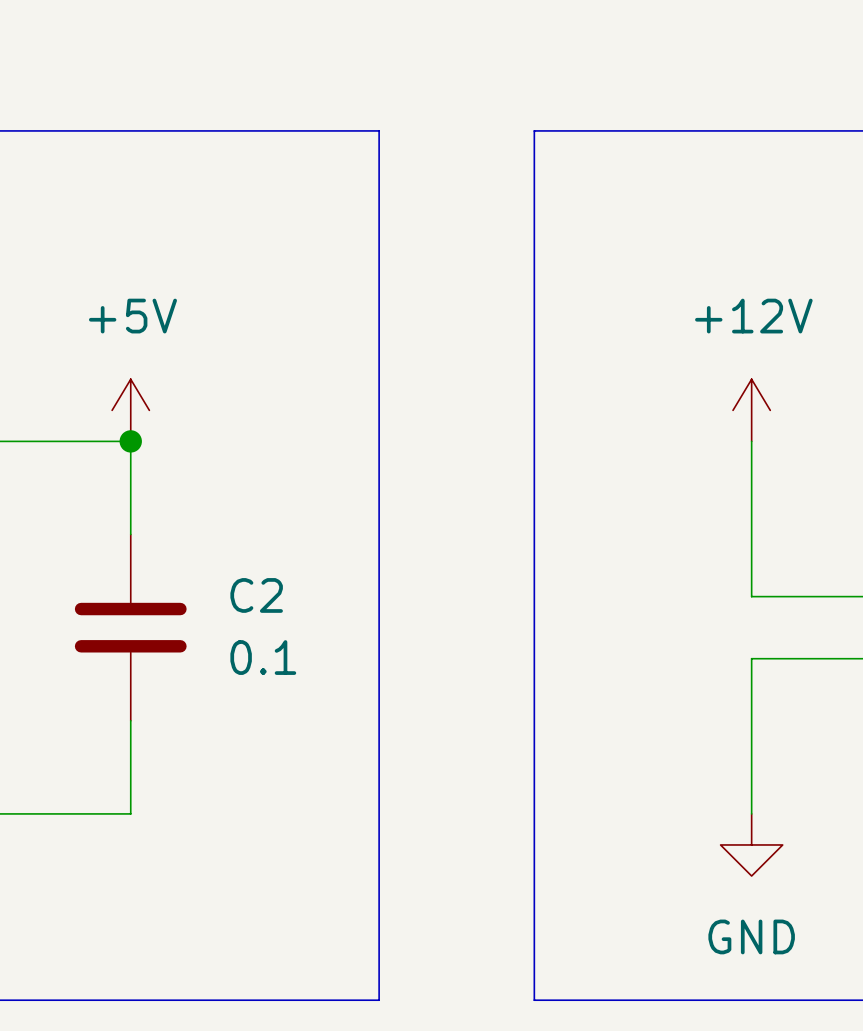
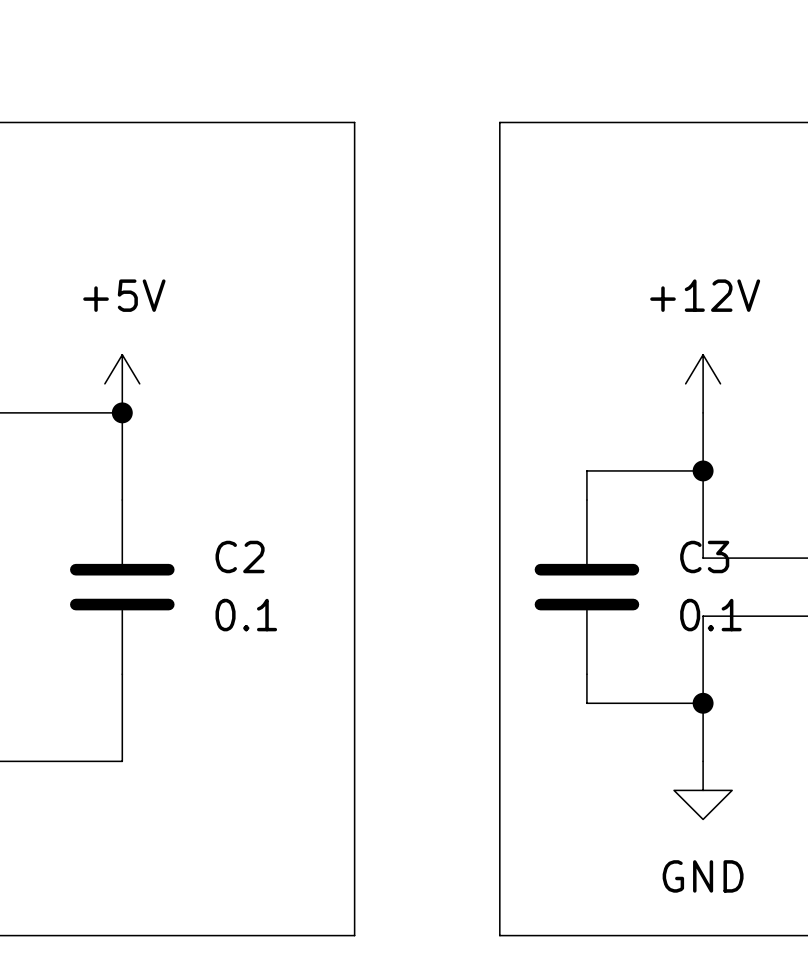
wire: none -> (703, 470) (586, 470) (586, 500)
junction: none -> (703, 470)
C3: none -> 0.1 (586, 587)
wire: none -> (586, 674) (586, 703) (703, 703)
junction: none -> (703, 703)

